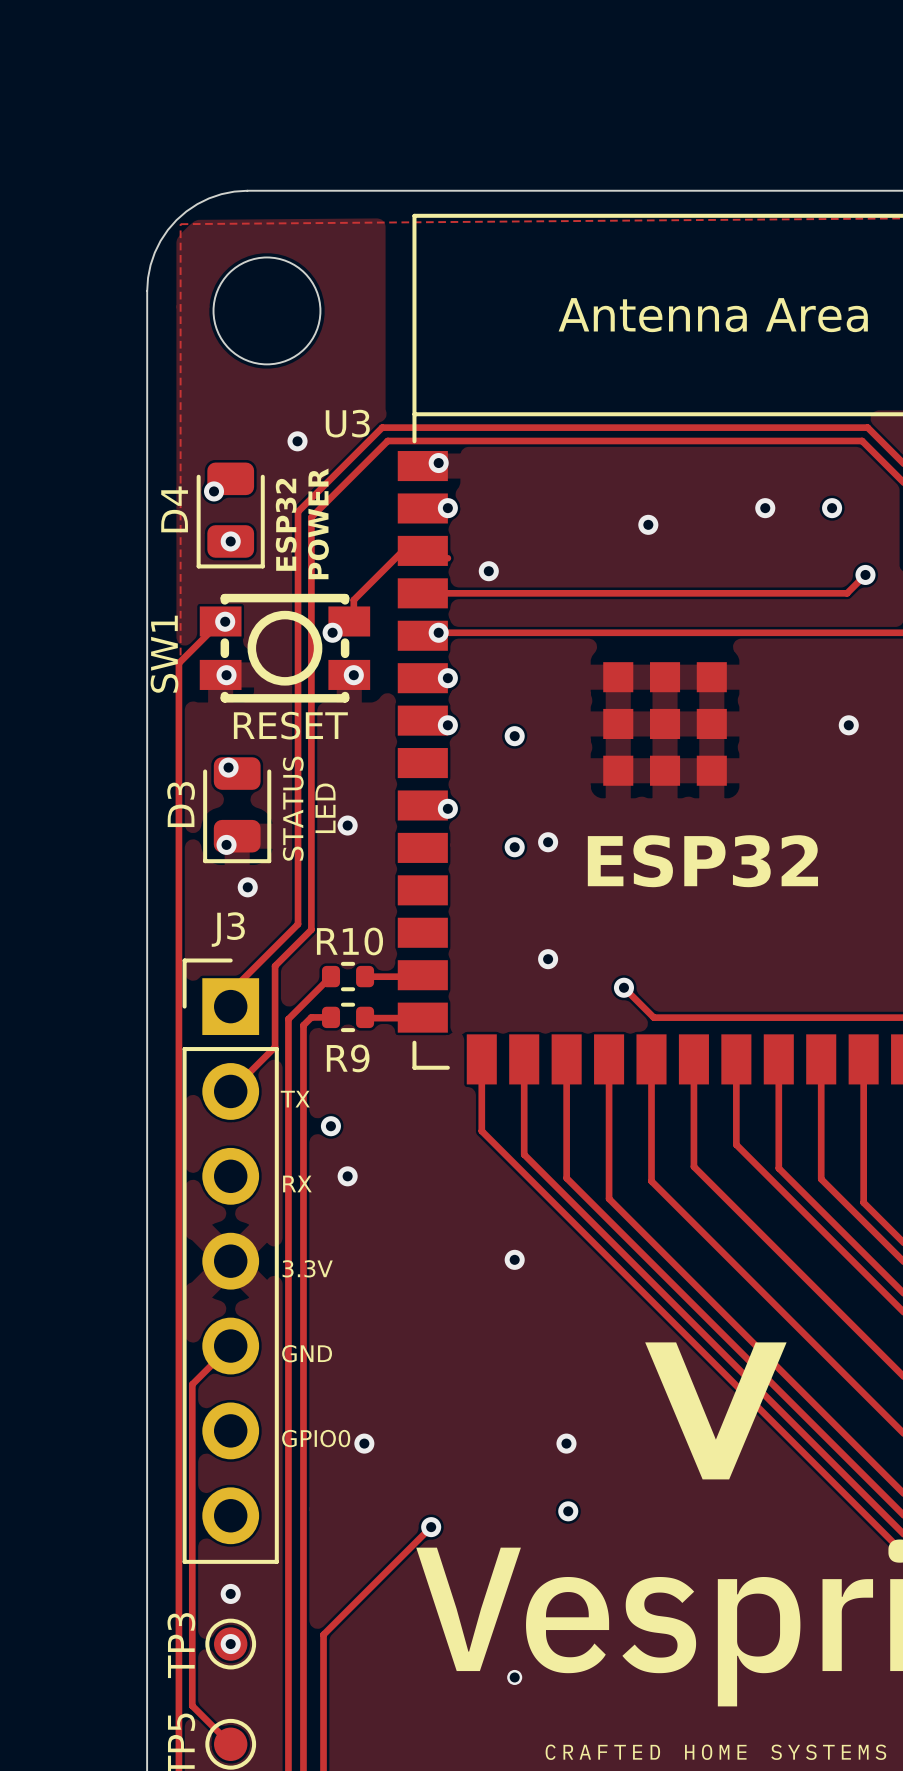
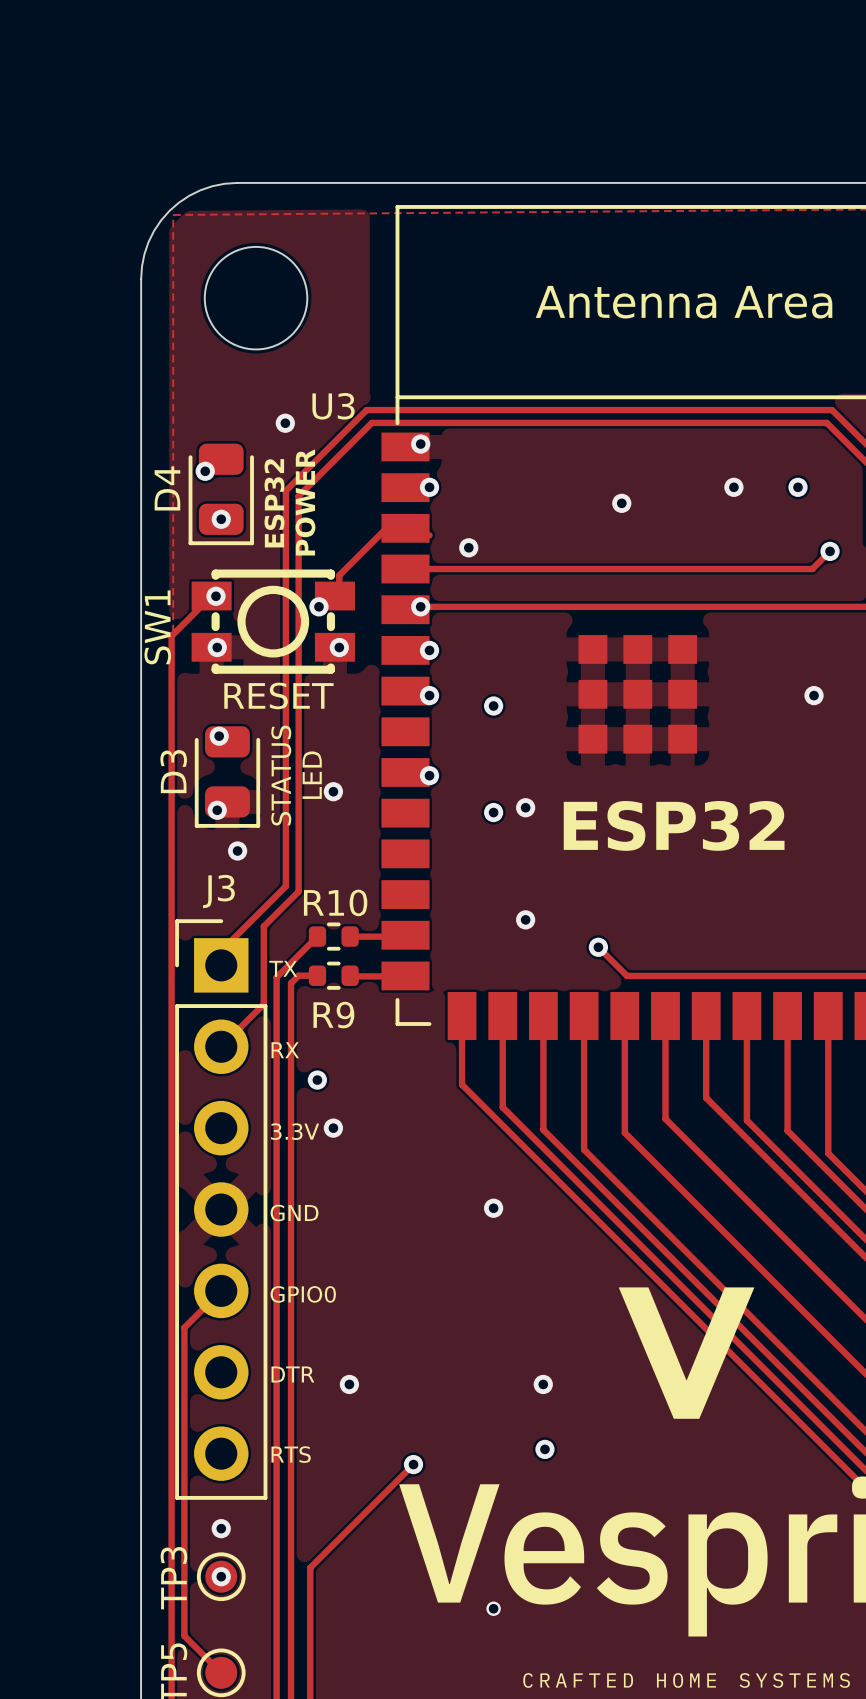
text: none -> TX (283, 968)
text: TX (295, 1099) -> RX (285, 1050)
text: RX (297, 1183) -> 3.3V (295, 1131)
text: 3.3V (307, 1268) -> GND (294, 1213)
text: GND (307, 1353) -> GPIO0 (303, 1294)
text: GPIO0 (316, 1438) -> DTR (292, 1374)
text: none -> RTS (291, 1454)

